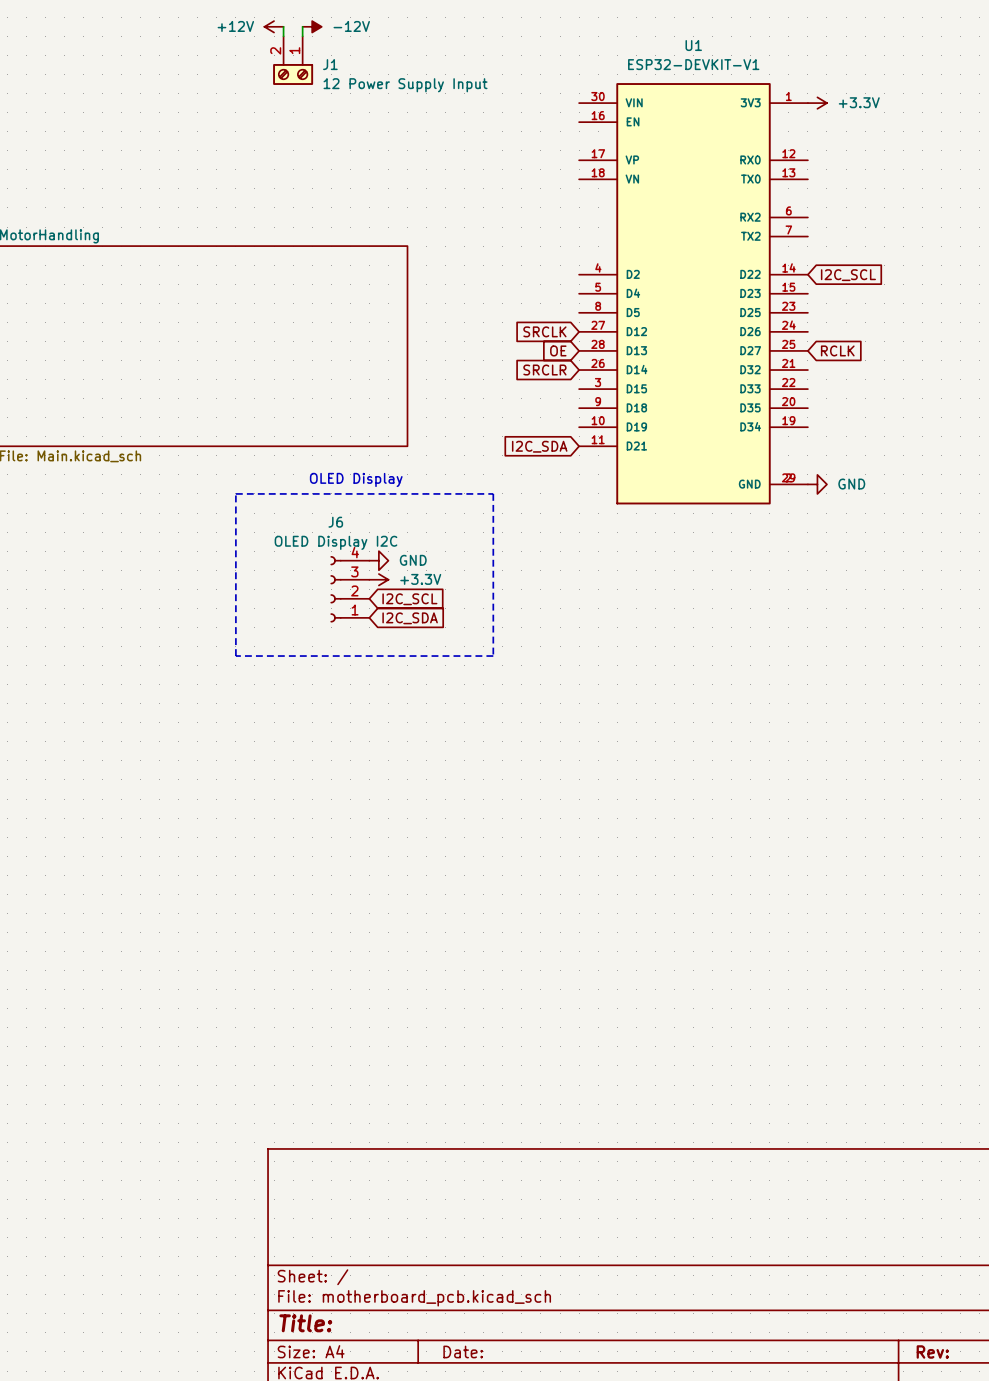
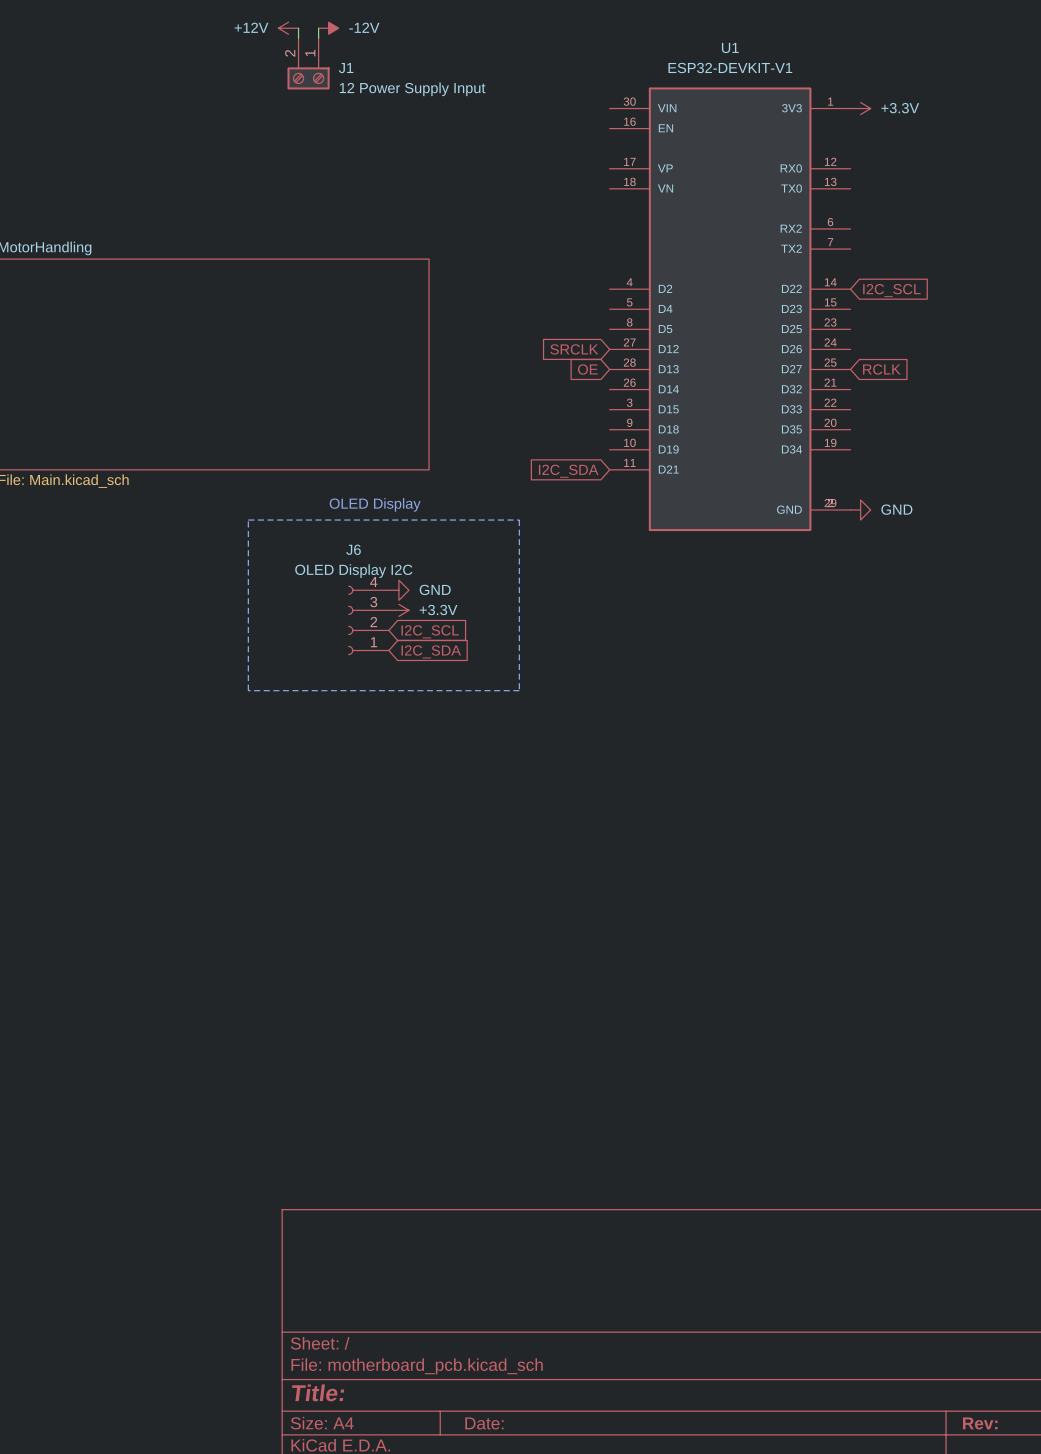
global label: SRCLR (544, 370) -> none

